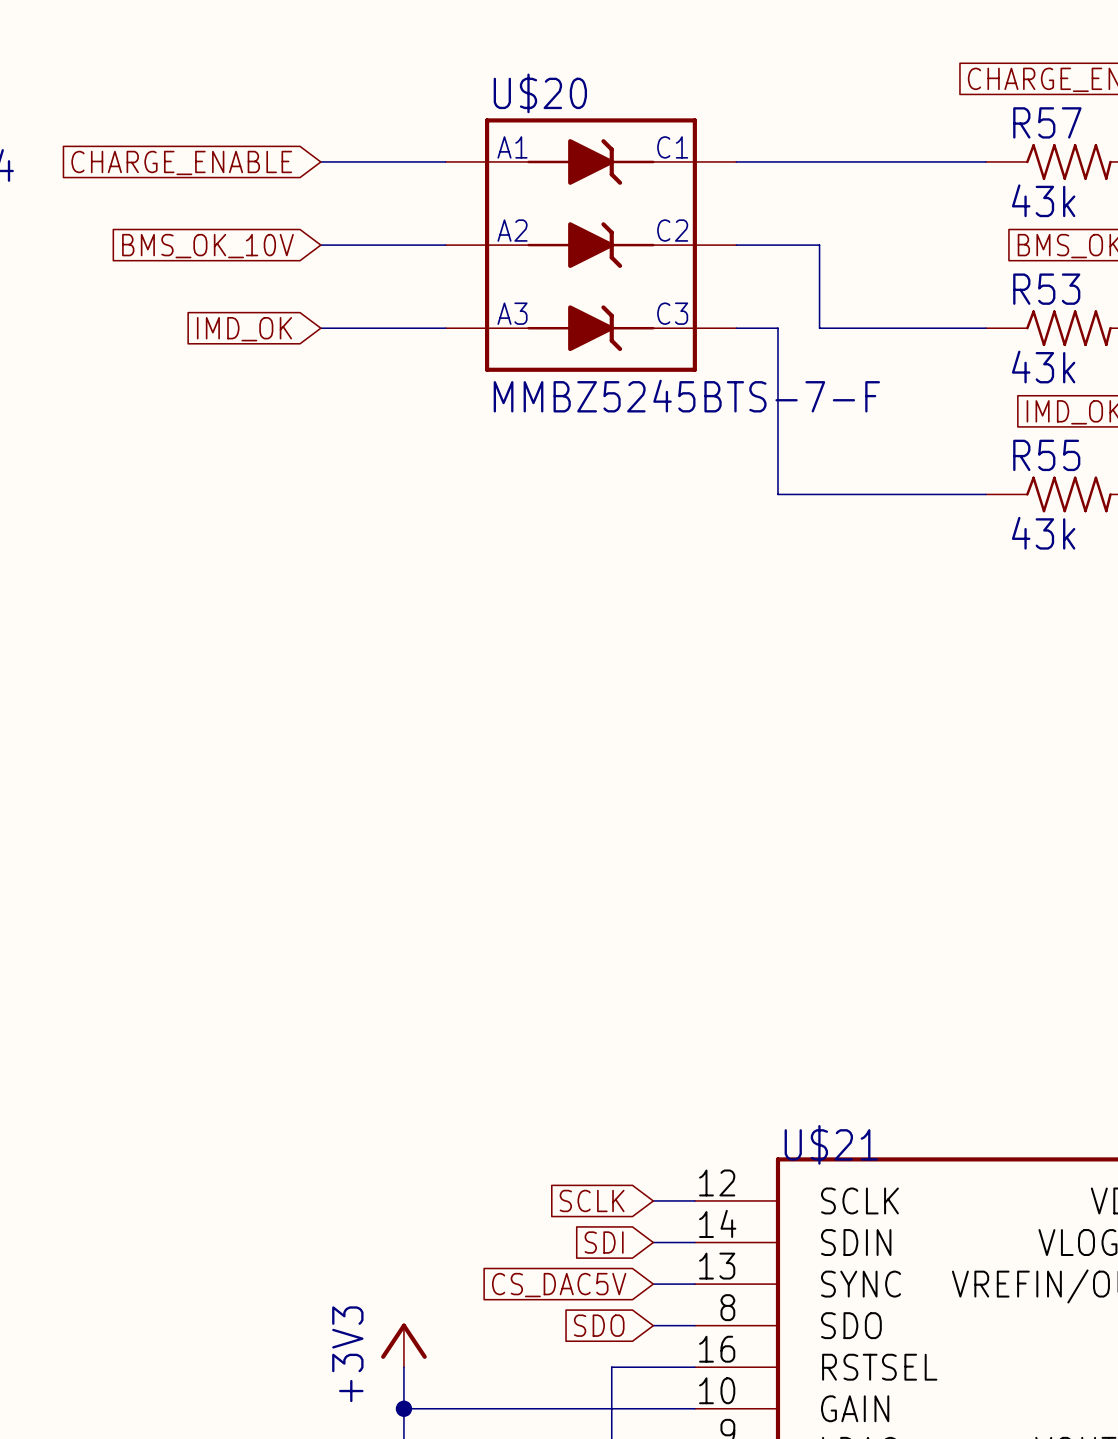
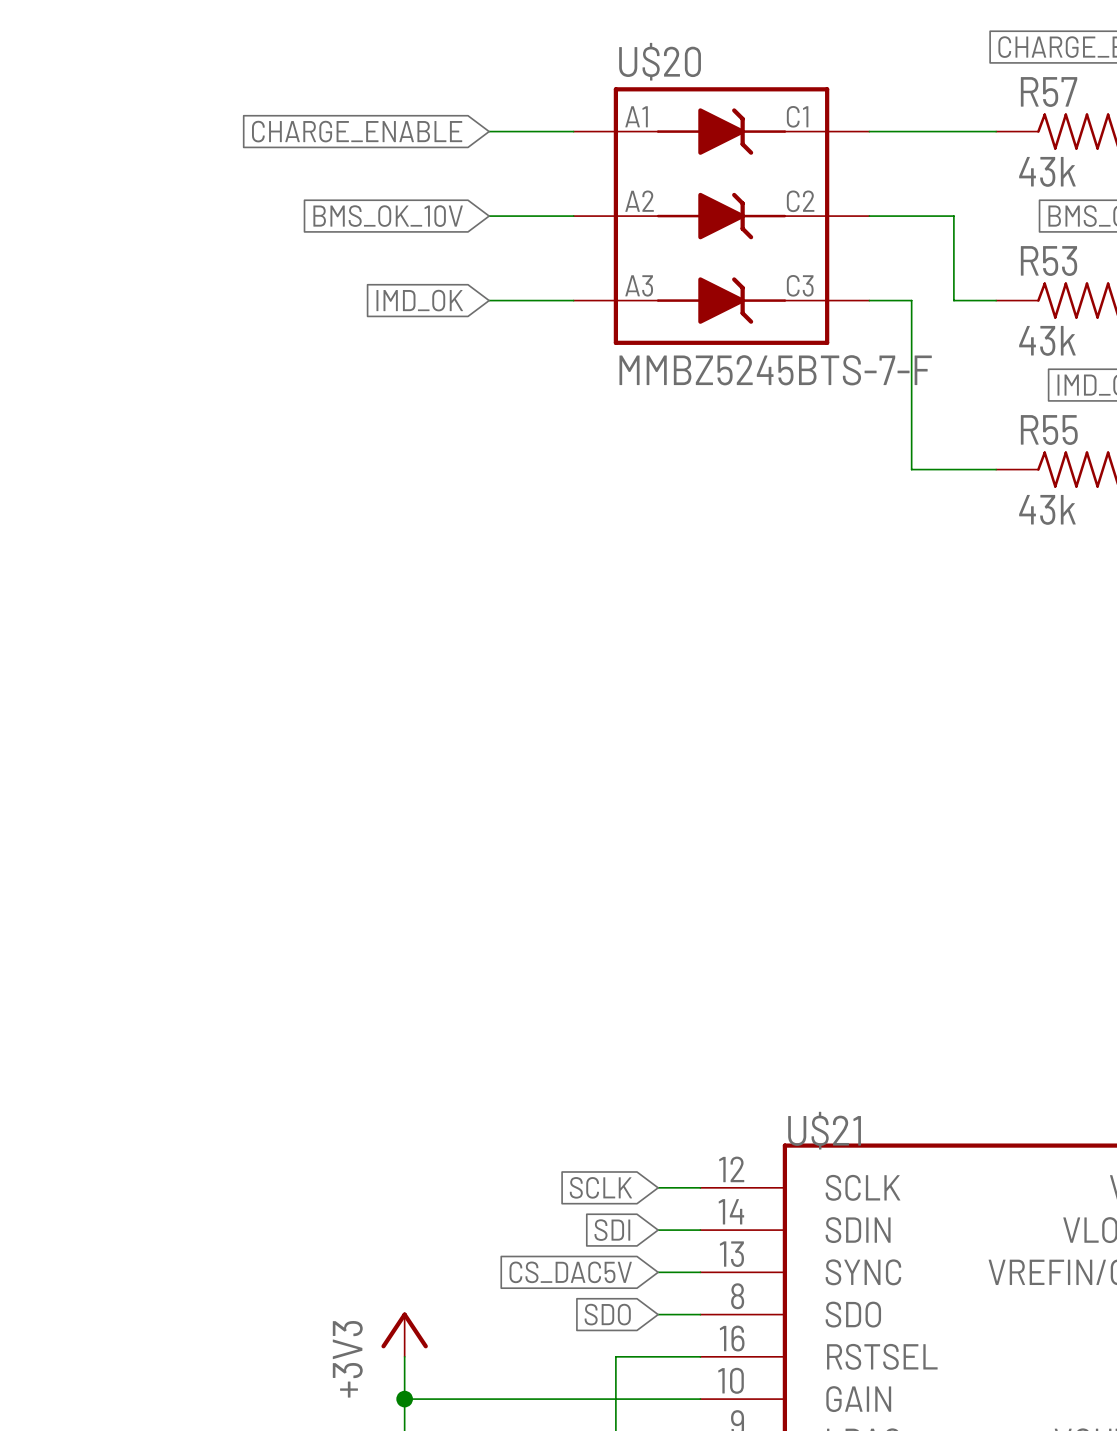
wire: (320, 161) (445, 161) -> none
global label position: CHARGE_ENABLE (181, 162) -> CHARGE_ENABLE (357, 131)
wire: (320, 245) (445, 245) -> none
U$20 position: (590, 245) -> (721, 216)
global label position: BMS_OK_10V (207, 246) -> BMS_OK_10V (388, 216)
wire: (320, 328) (445, 328) -> none
wire: (736, 328) (777, 328) (777, 494) (902, 494) -> (911, 300) (911, 469)
wire: (902, 328) (944, 328) -> (869, 216) (953, 216) (953, 300)
global label position: IMD_OK (244, 329) -> IMD_OK (419, 300)

